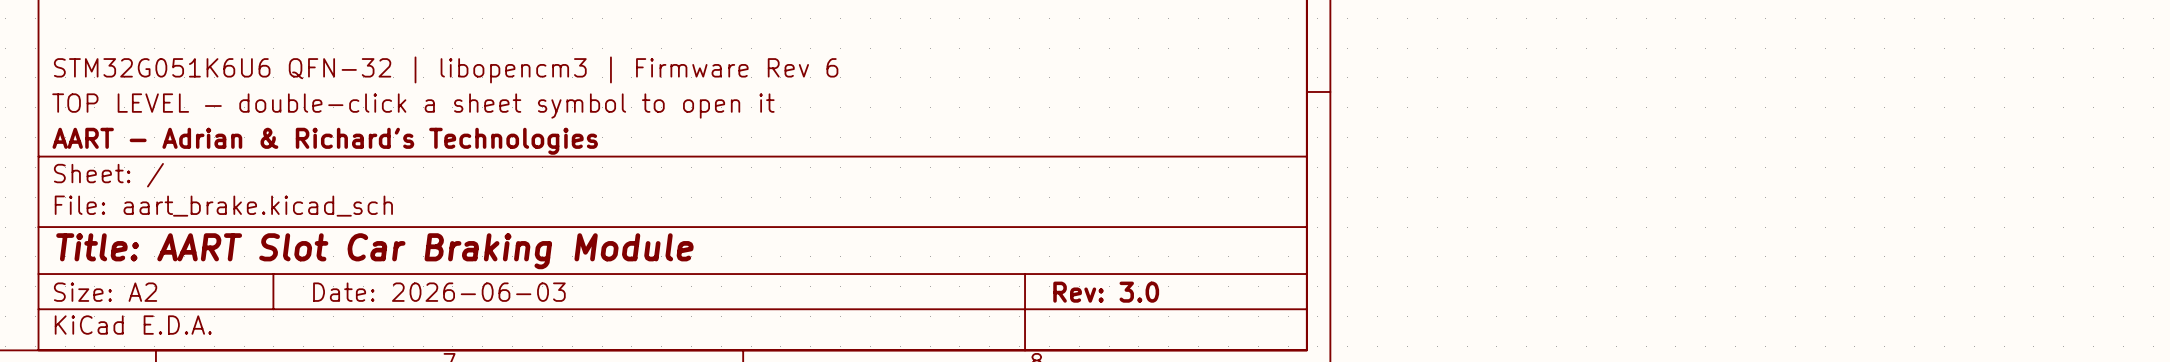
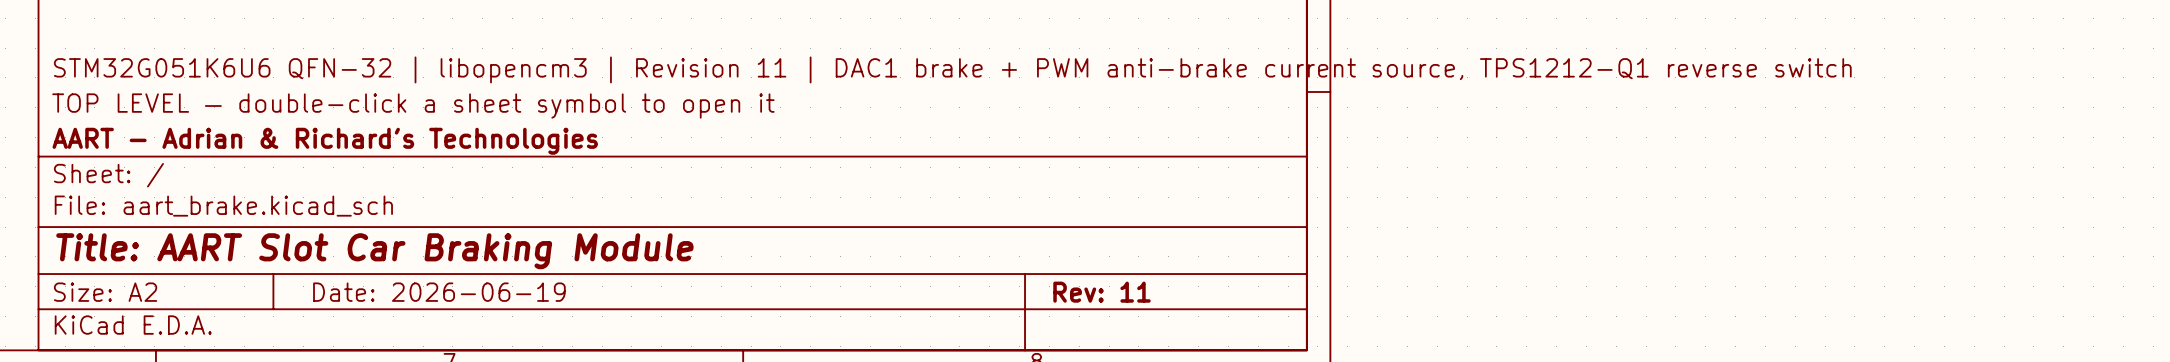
title block: STM32G051K6U6 QFN-32 | libopencm3 | Firmware Rev 6 (446, 69) -> STM32G051K6U6 QFN-32 | libopencm3 | Revision 11 | DAC1 brake + PWM anti-brake current source, TPS1212-Q1 reverse switch (952, 69)
title block: Date: 2026-06-03 (439, 292) -> Date: 2026-06-19 (439, 292)
title block: Rev: 3.0 (1106, 292) -> Rev: 11 (1102, 292)

